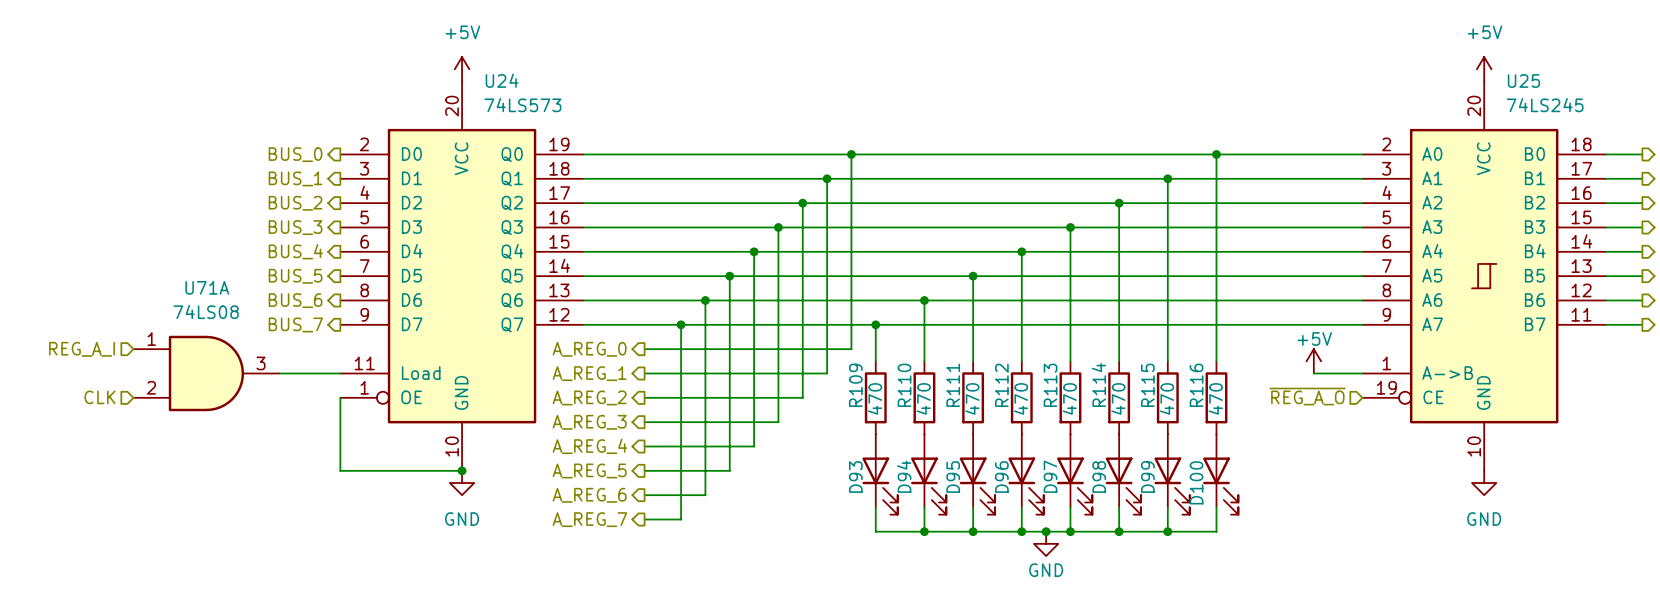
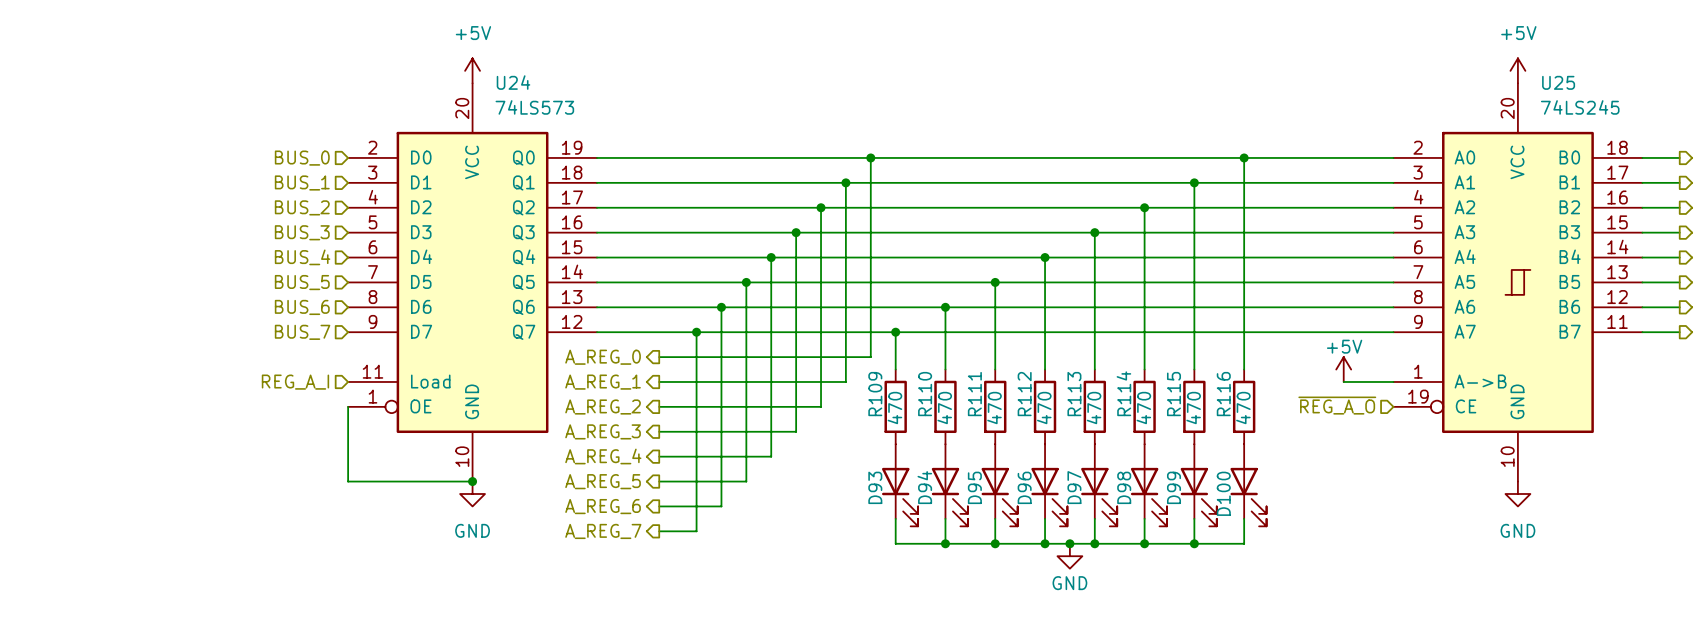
hierarchical label shape: output (295, 154) -> input (302, 158)
hierarchical label shape: output (295, 178) -> input (302, 182)
hierarchical label shape: output (295, 203) -> input (302, 207)
hierarchical label shape: output (295, 227) -> input (302, 232)
hierarchical label shape: output (295, 251) -> input (302, 257)
hierarchical label shape: output (295, 276) -> input (302, 282)
hierarchical label shape: output (295, 300) -> input (302, 307)
hierarchical label shape: output (295, 324) -> input (302, 332)
hierarchical label position: REG_A_I (82, 349) -> REG_A_I (295, 382)
U71A: 74LS08 (206, 373) -> none
wire: (279, 373) (340, 373) -> none
hierarchical label: CLK (99, 397) -> none

